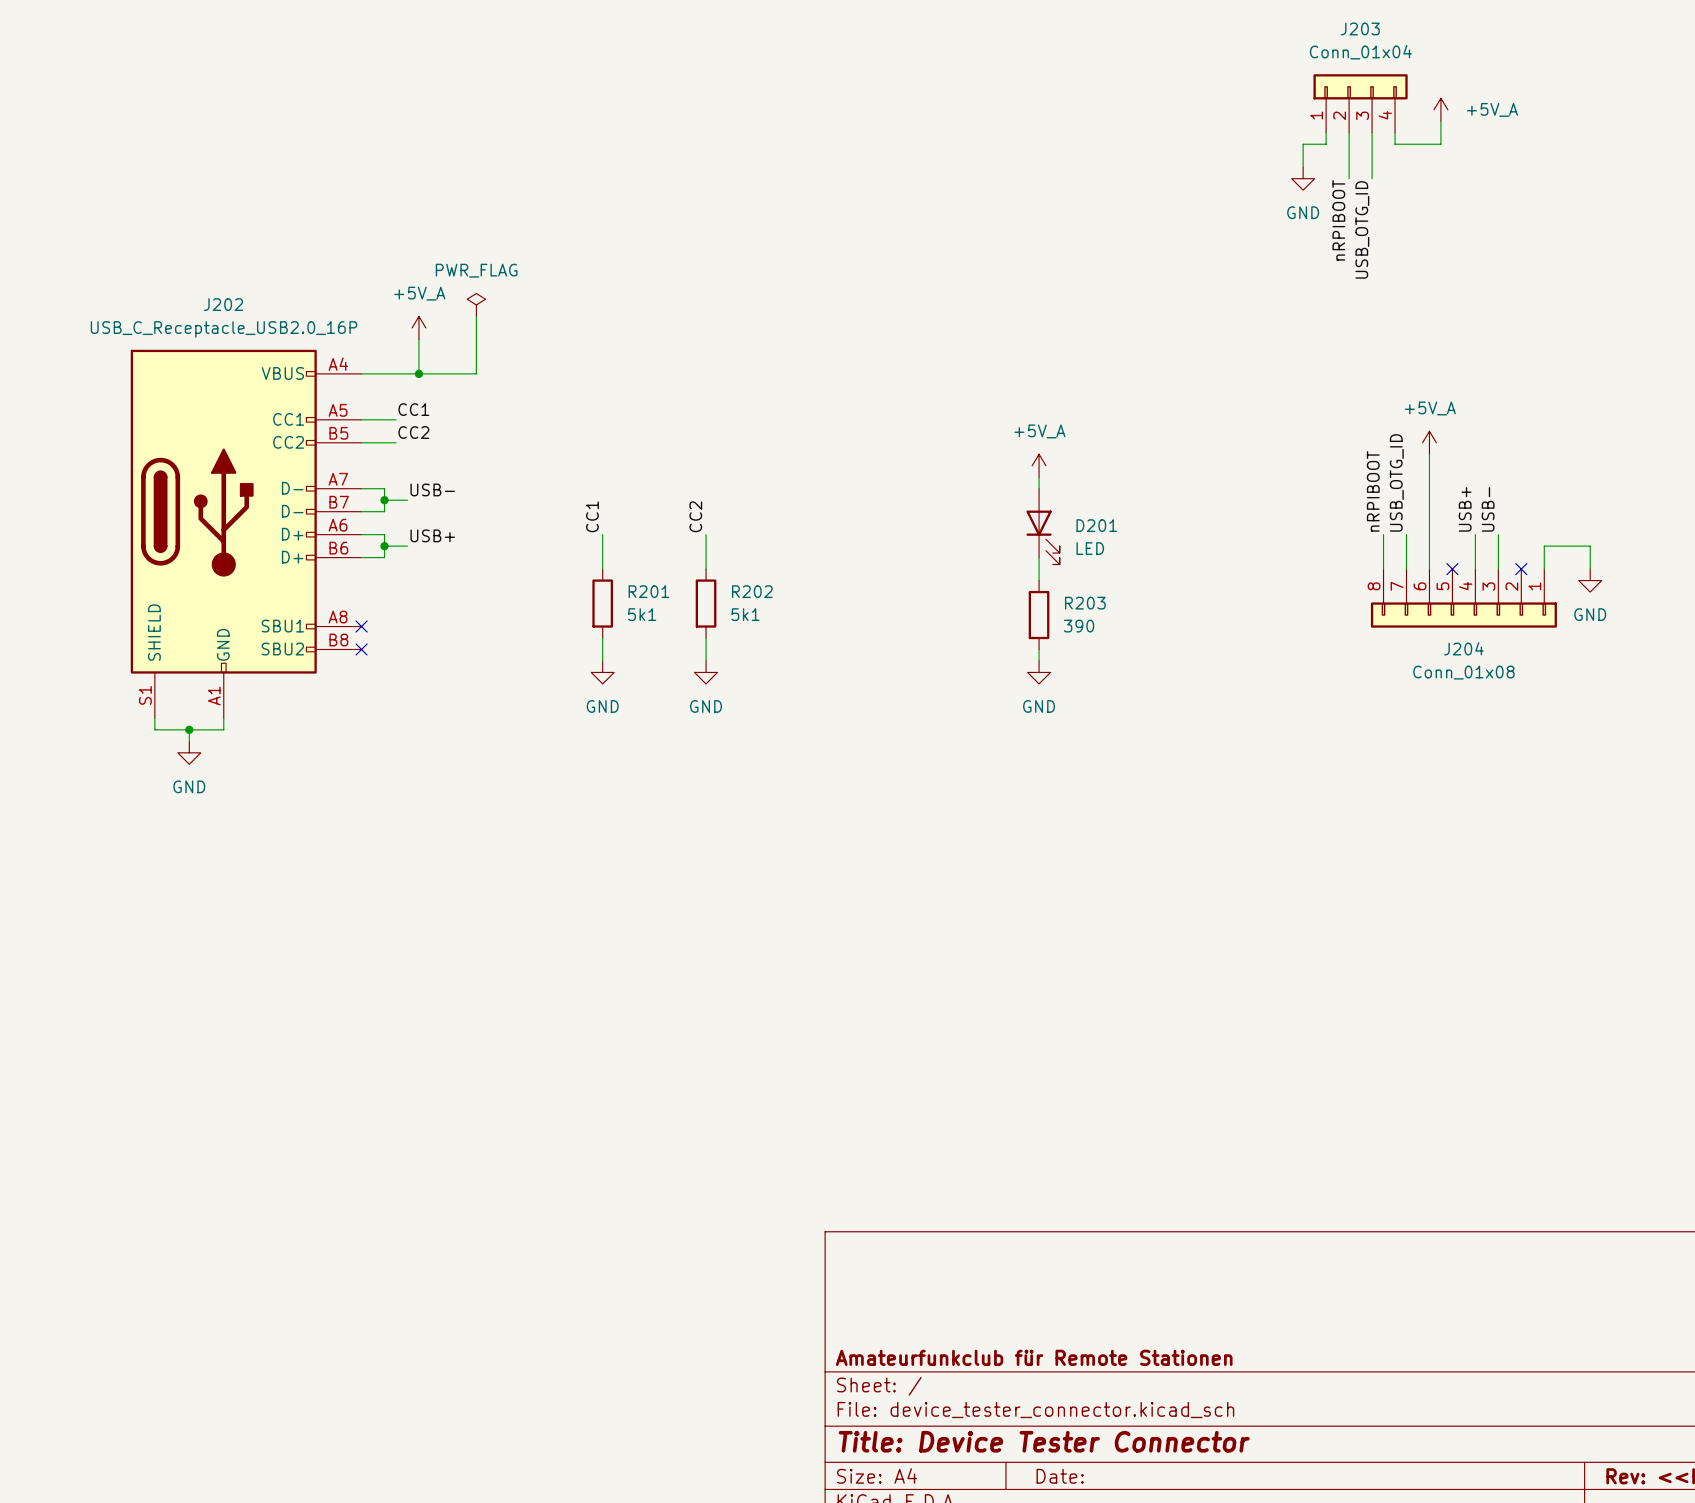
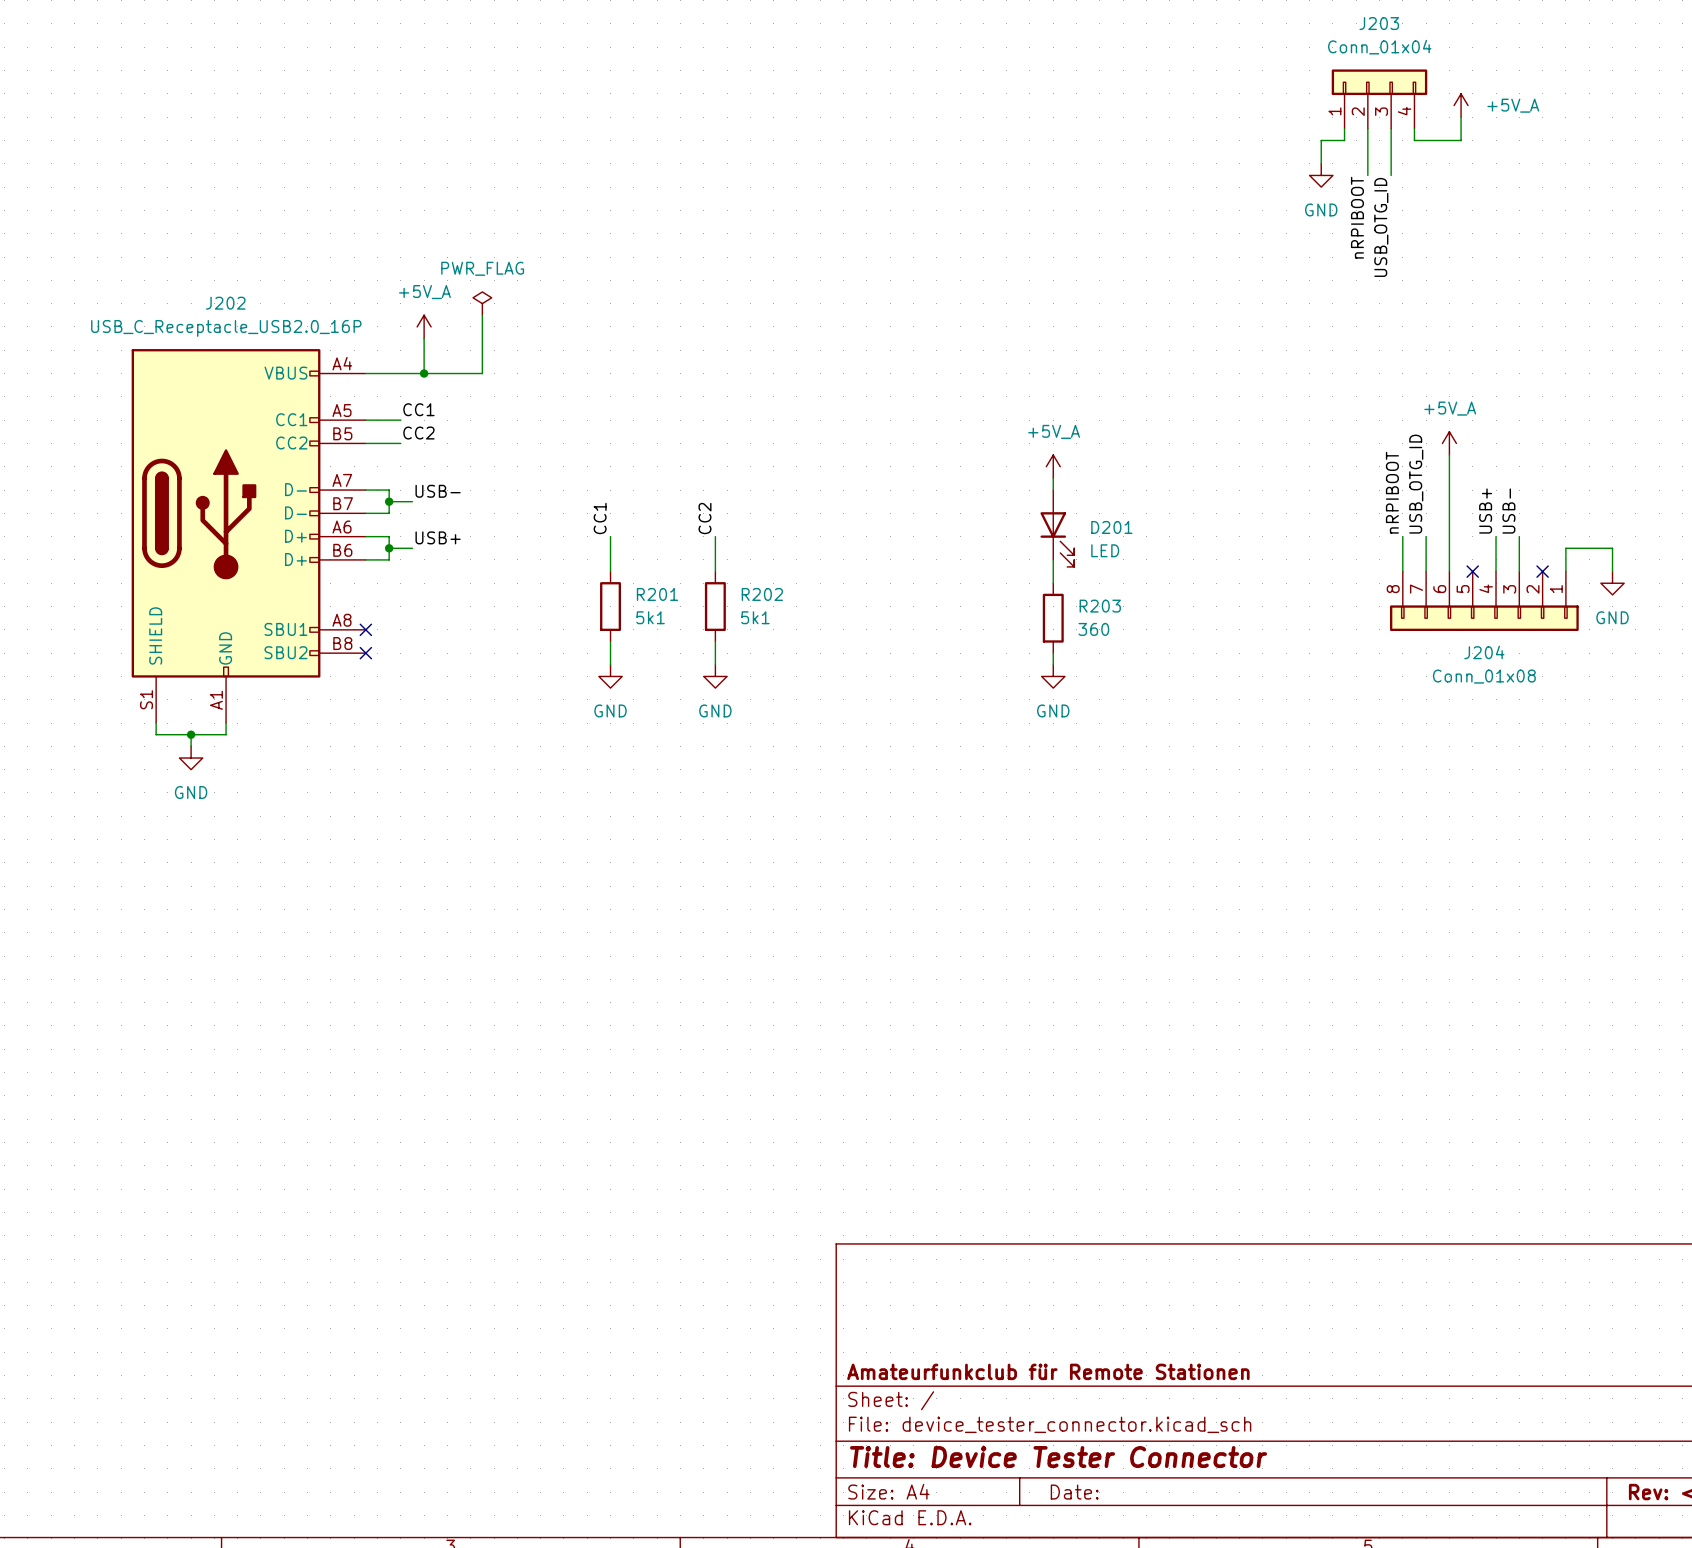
R203 value: 390 (1079, 626) -> 360 (1093, 629)

